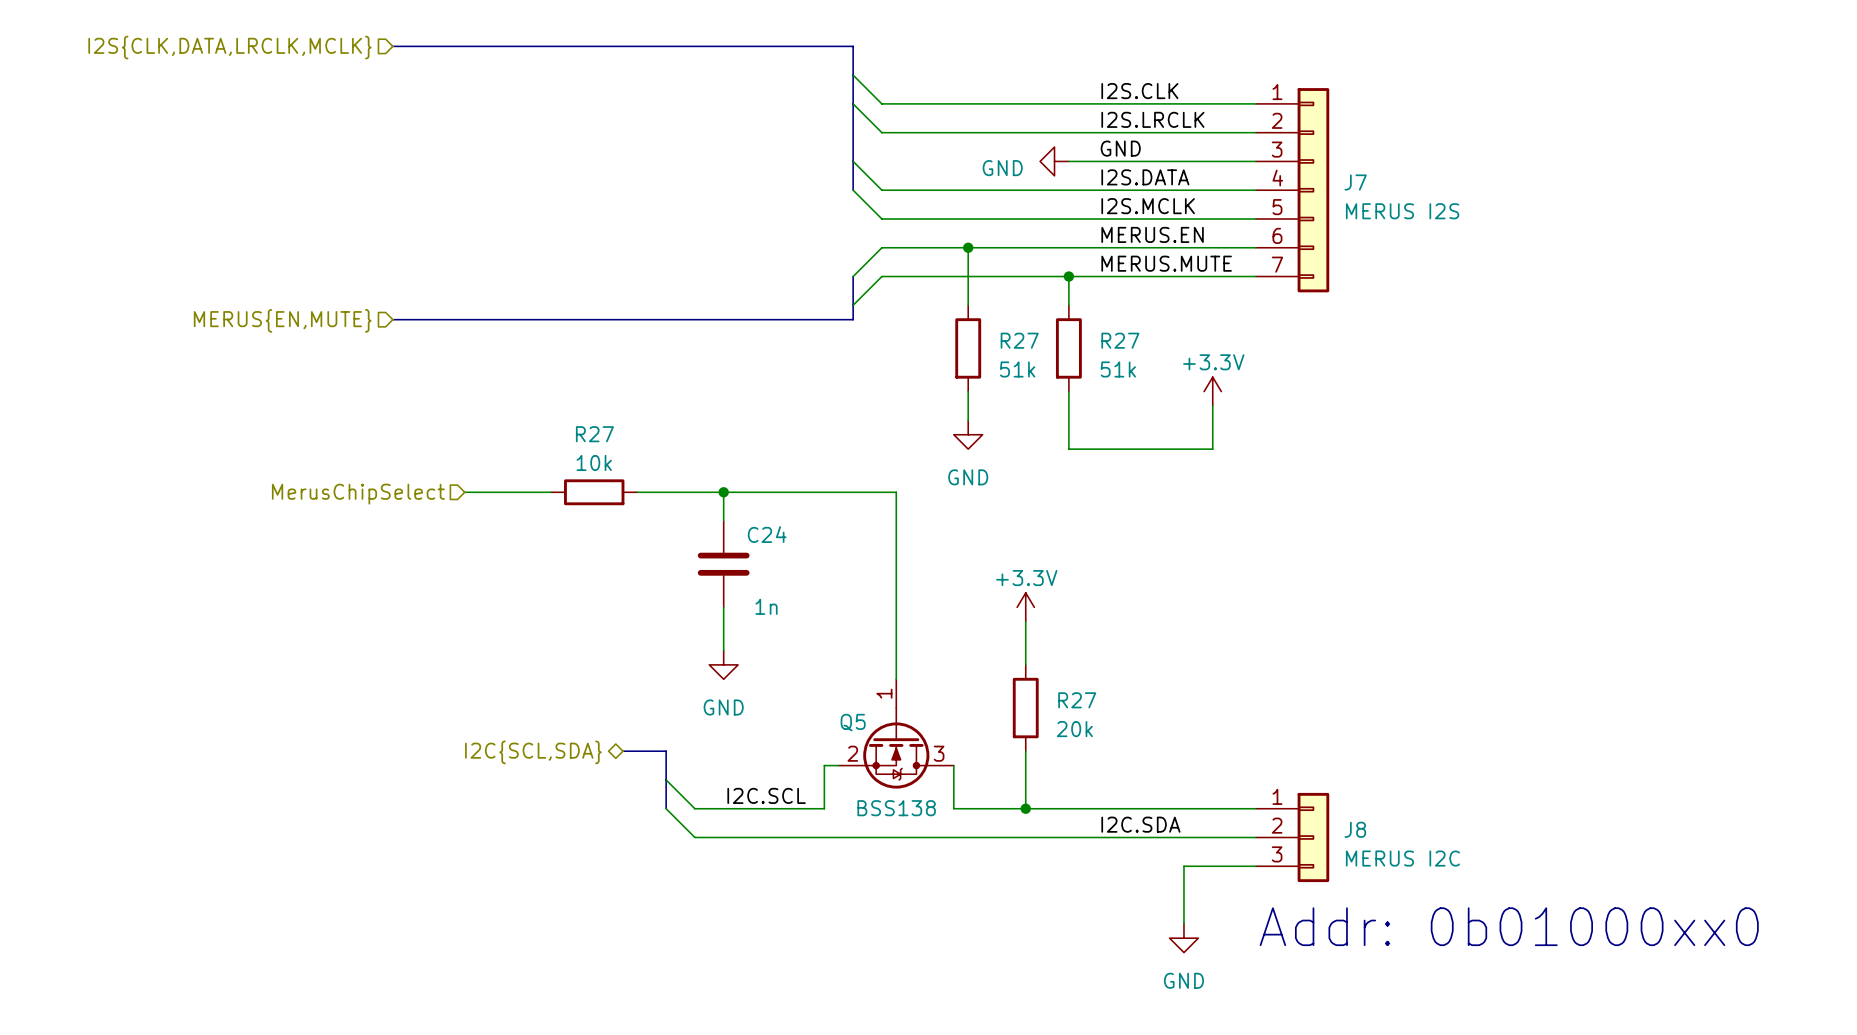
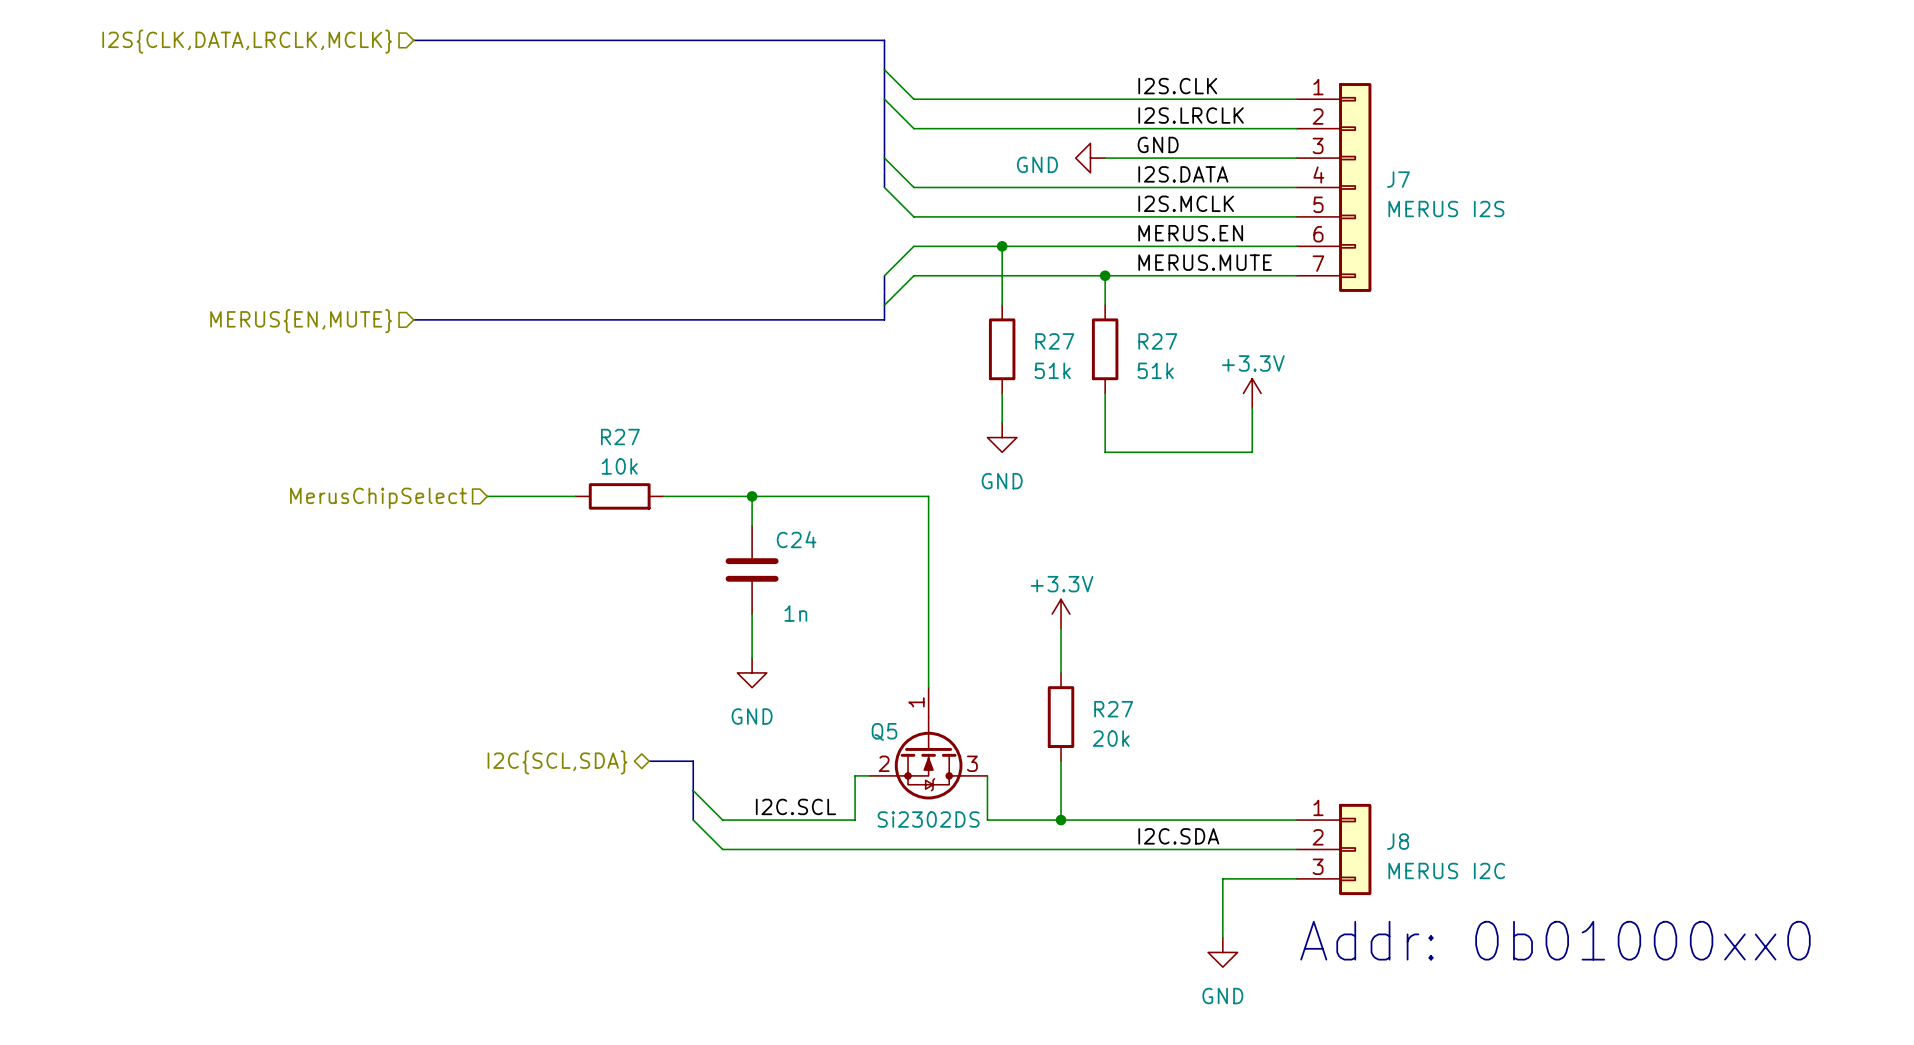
Q5 value: BSS138 (896, 808) -> Si2302DS (928, 819)

